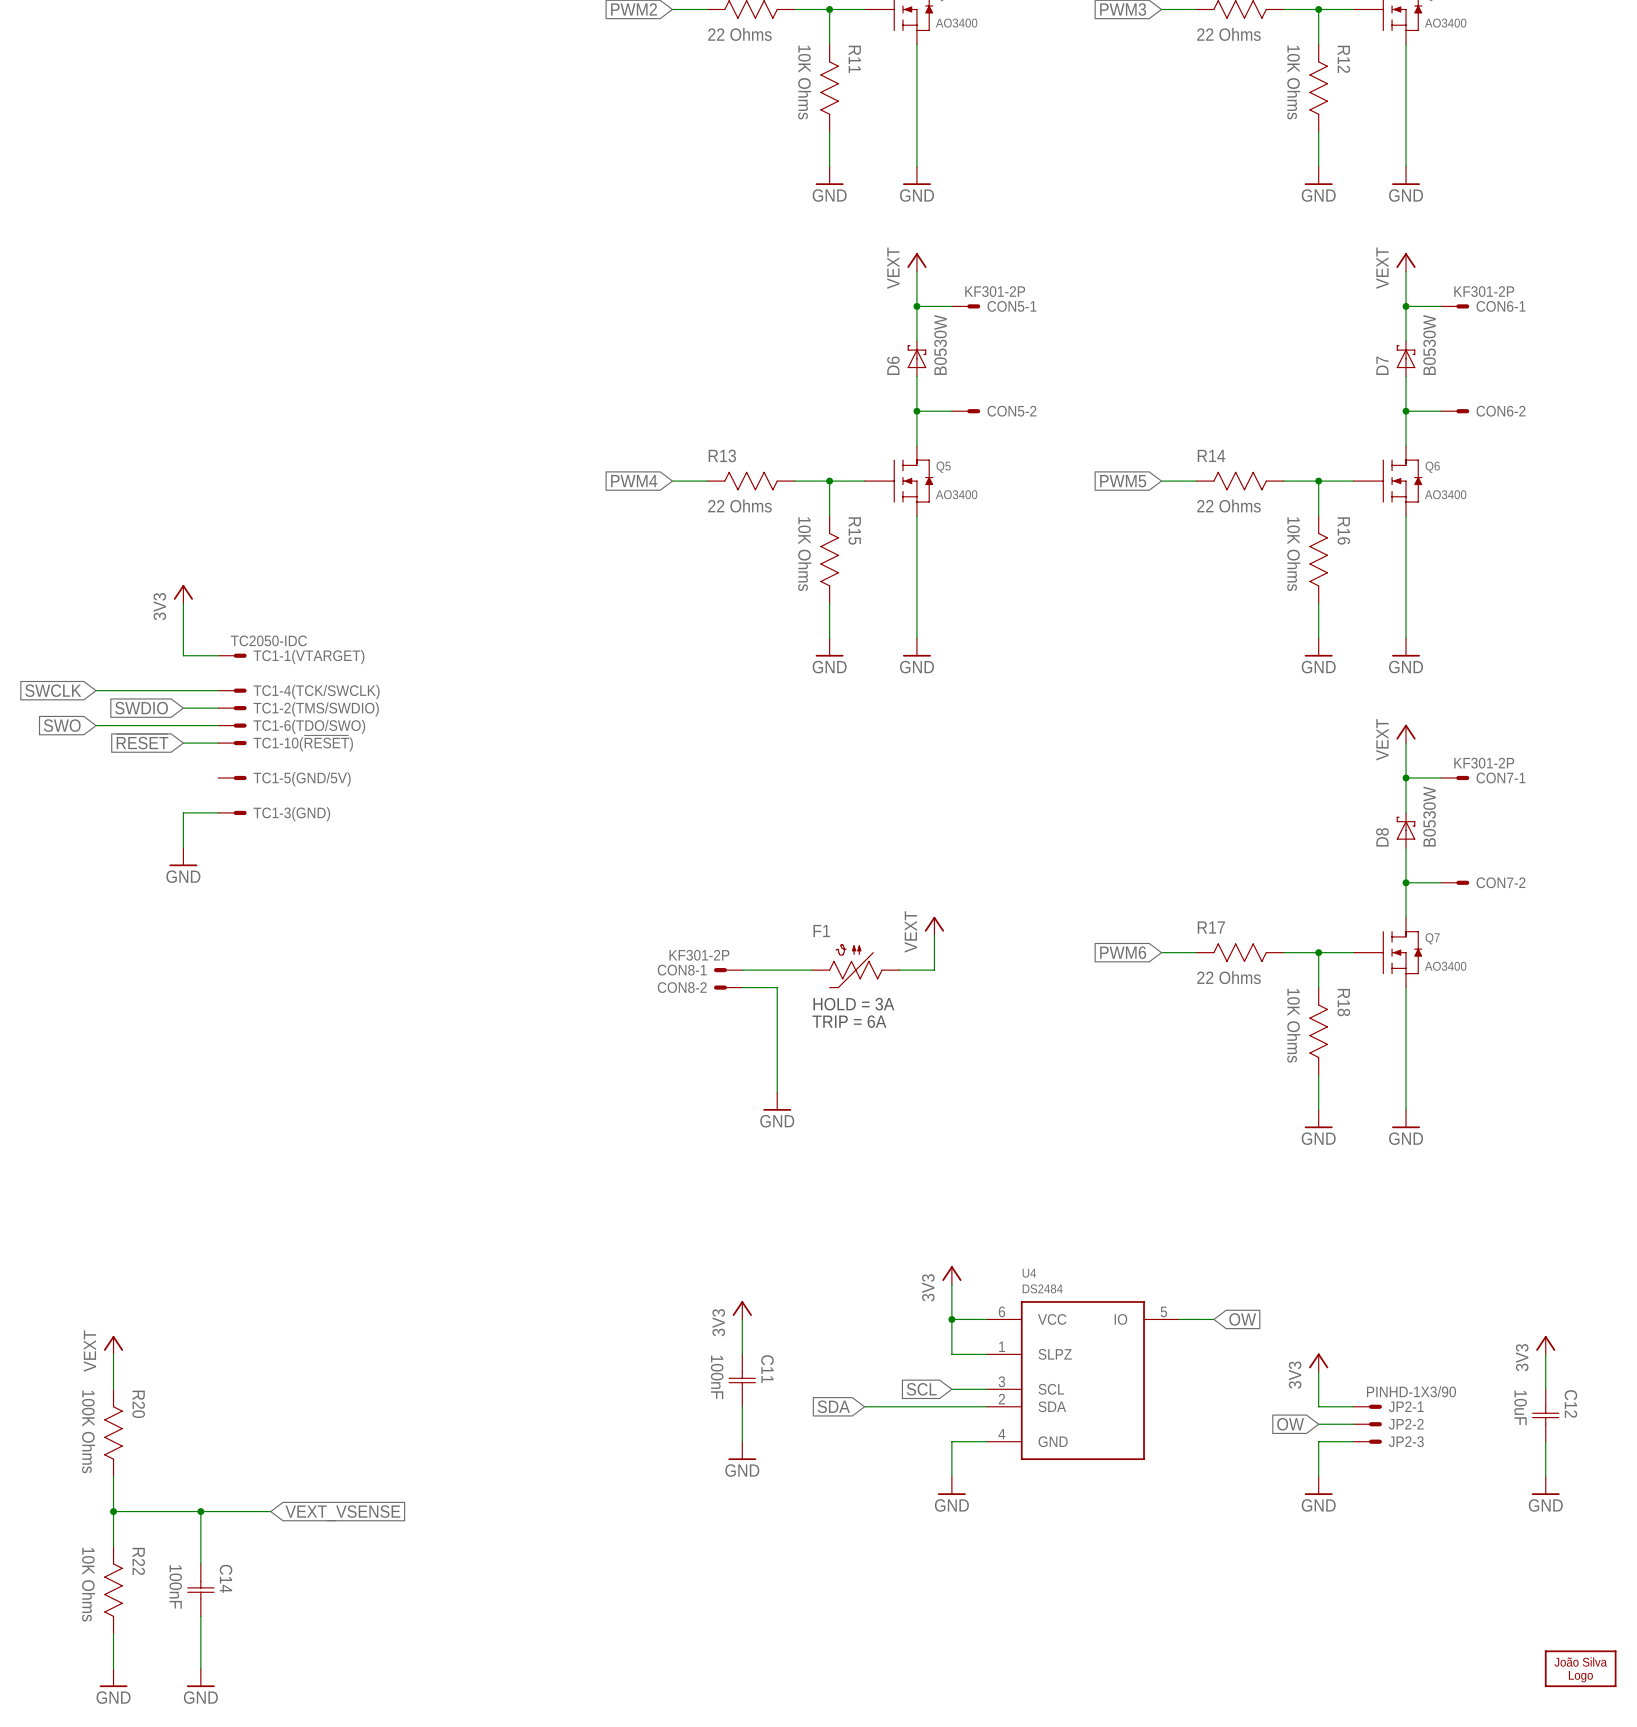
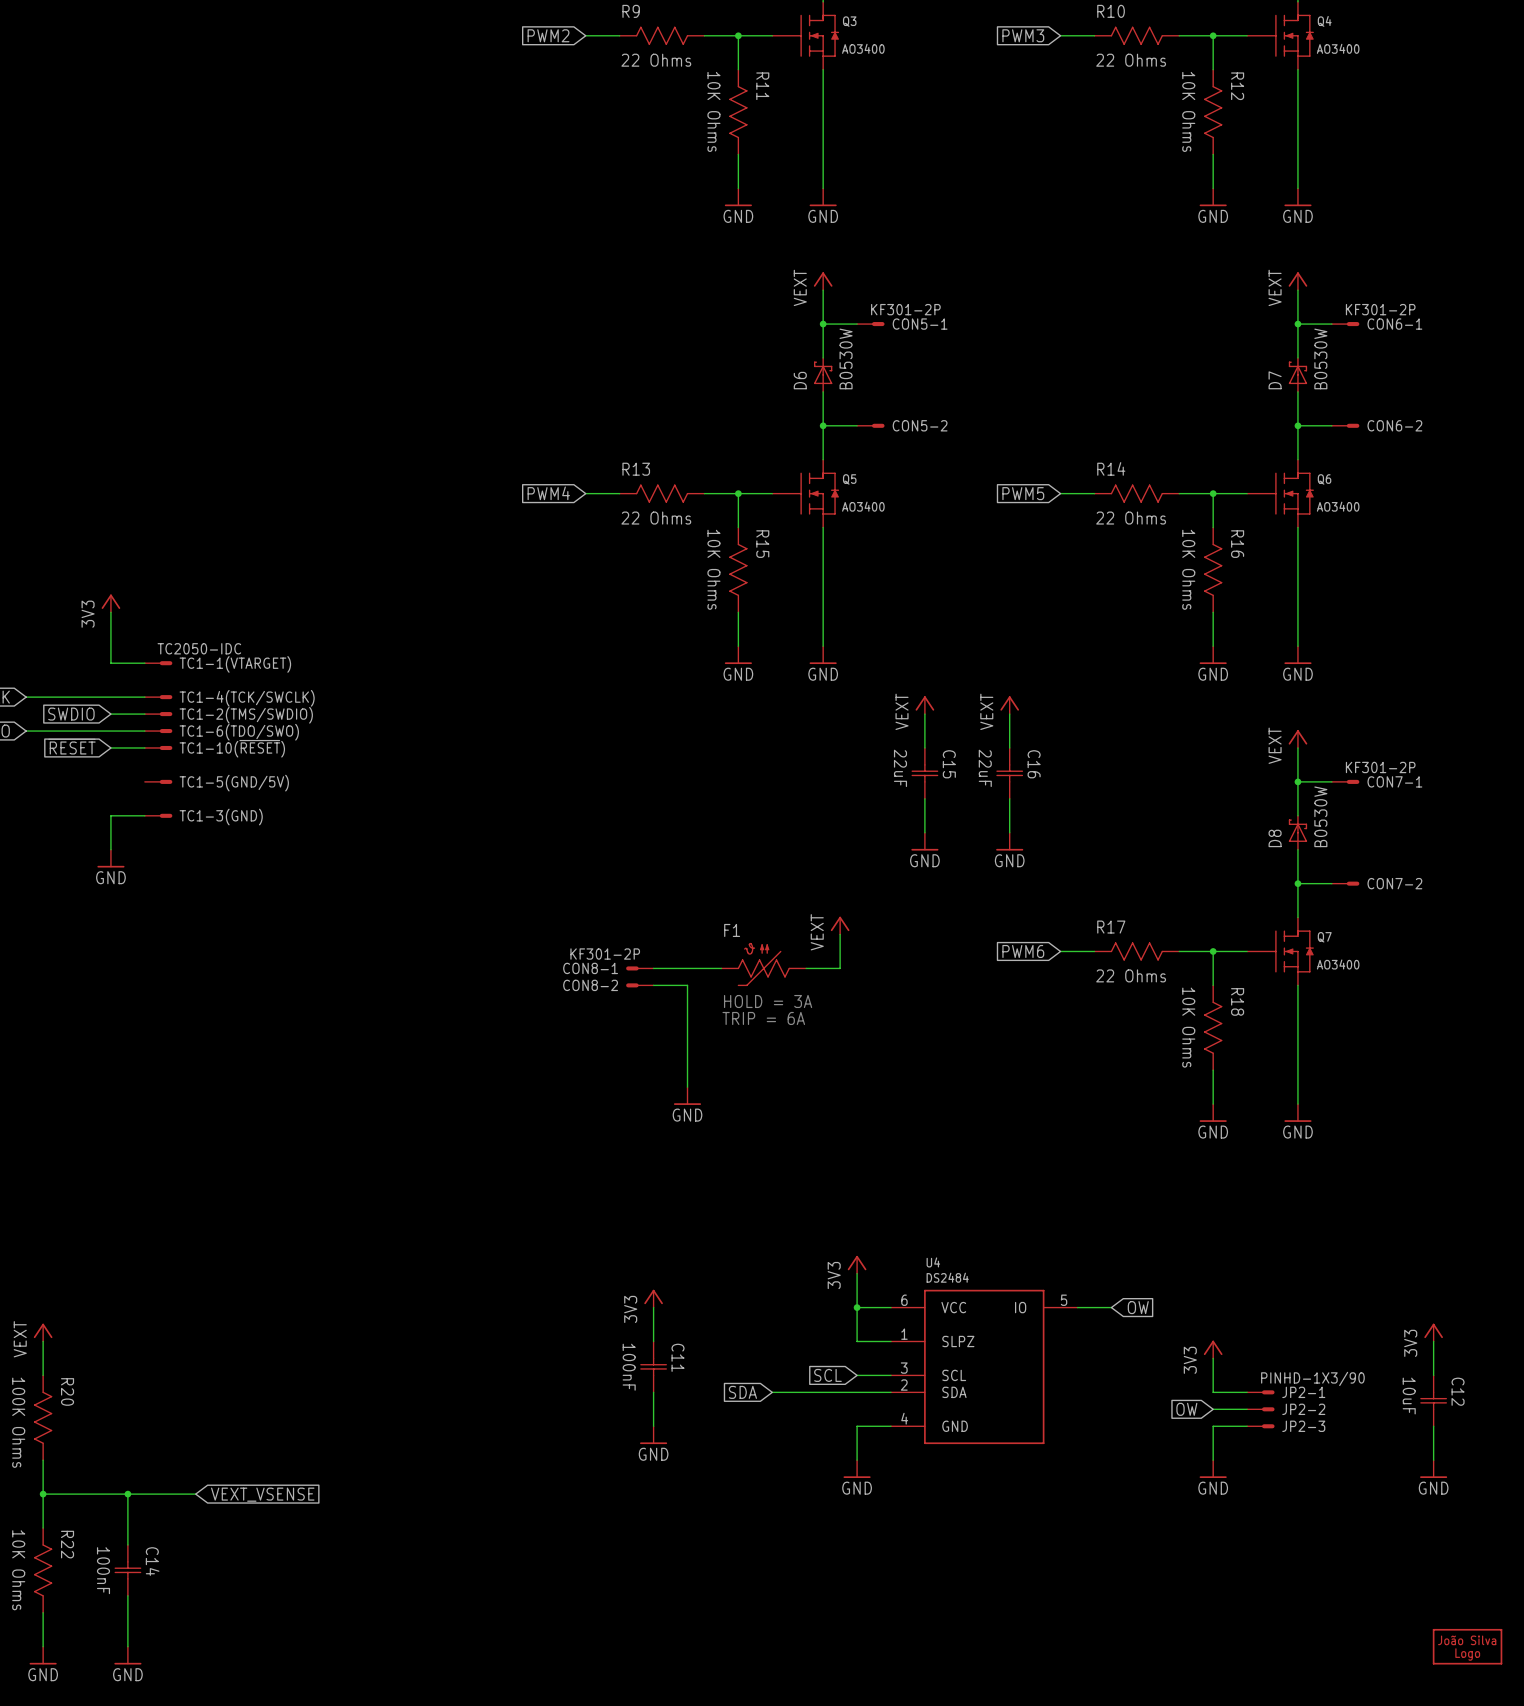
power symbol: none -> VEXT (924, 705)
power symbol: none -> VEXT (1009, 705)
wire: none -> (924, 714) (924, 747)
wire: none -> (1009, 714) (1009, 747)
C15: none -> 22uF (924, 773)
C16: none -> 22uF (1009, 773)
wire: none -> (924, 798) (924, 832)
wire: none -> (1009, 798) (1009, 832)
power symbol: none -> GND (924, 841)
power symbol: none -> GND (1009, 841)

